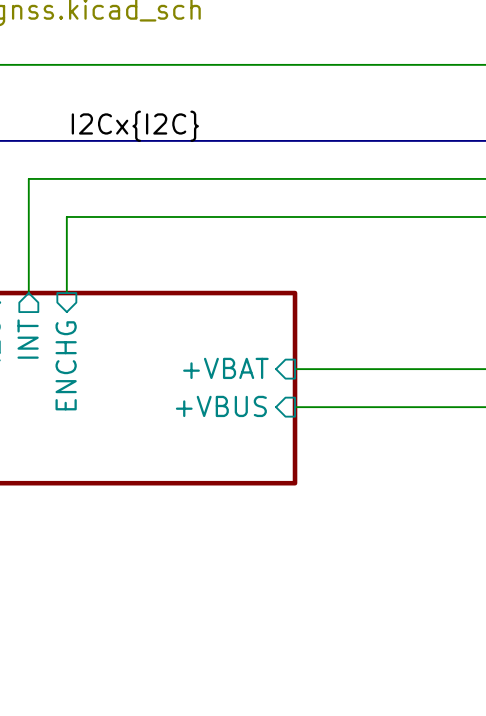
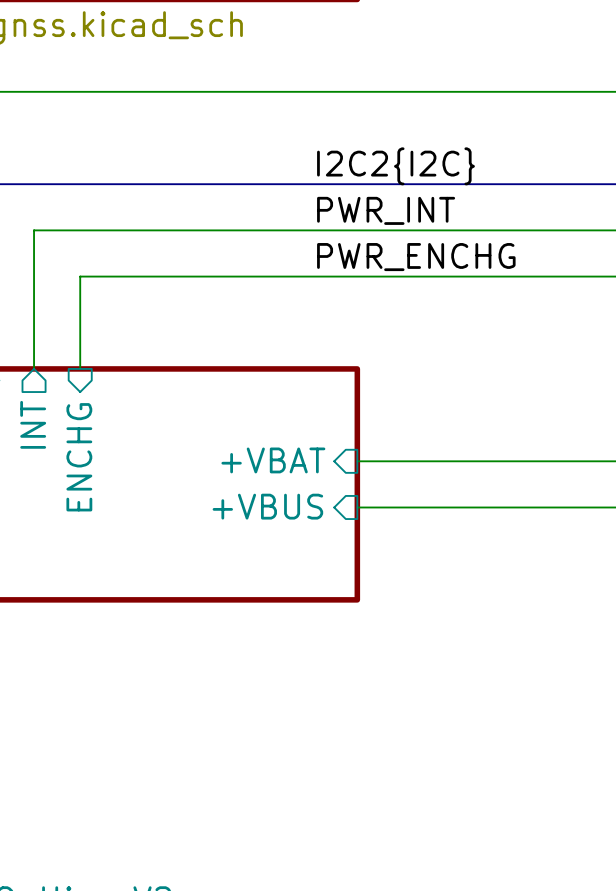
label: I2Cx{I2C} (135, 126) -> none
label: none -> I2C2{I2C} (395, 166)
label: none -> PWR_INT (386, 210)
label: none -> PWR_ENCHG (416, 257)

